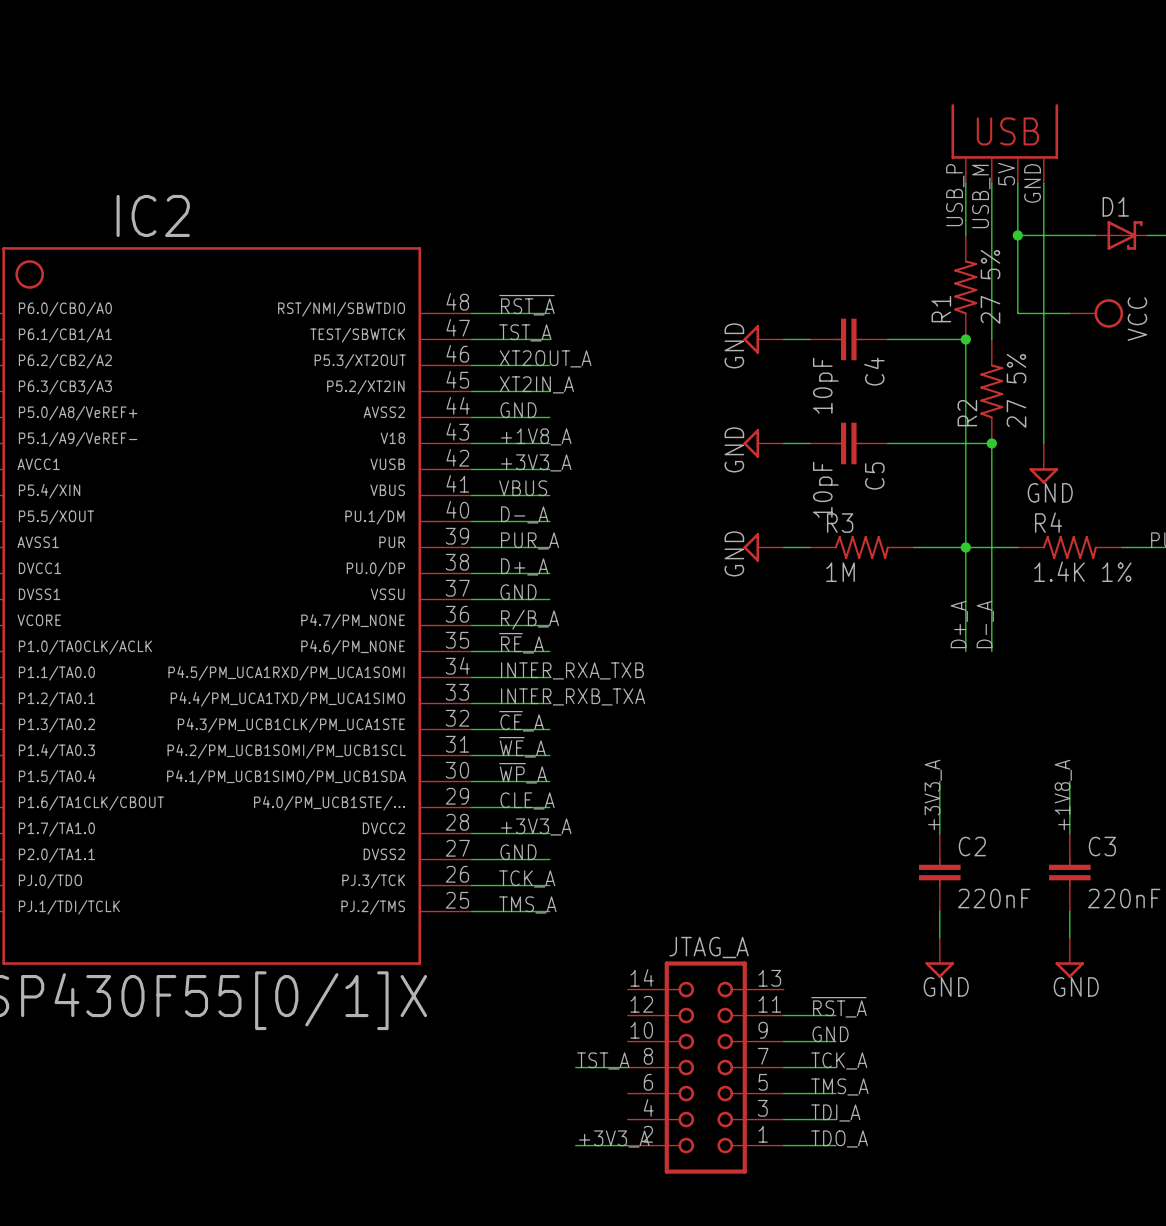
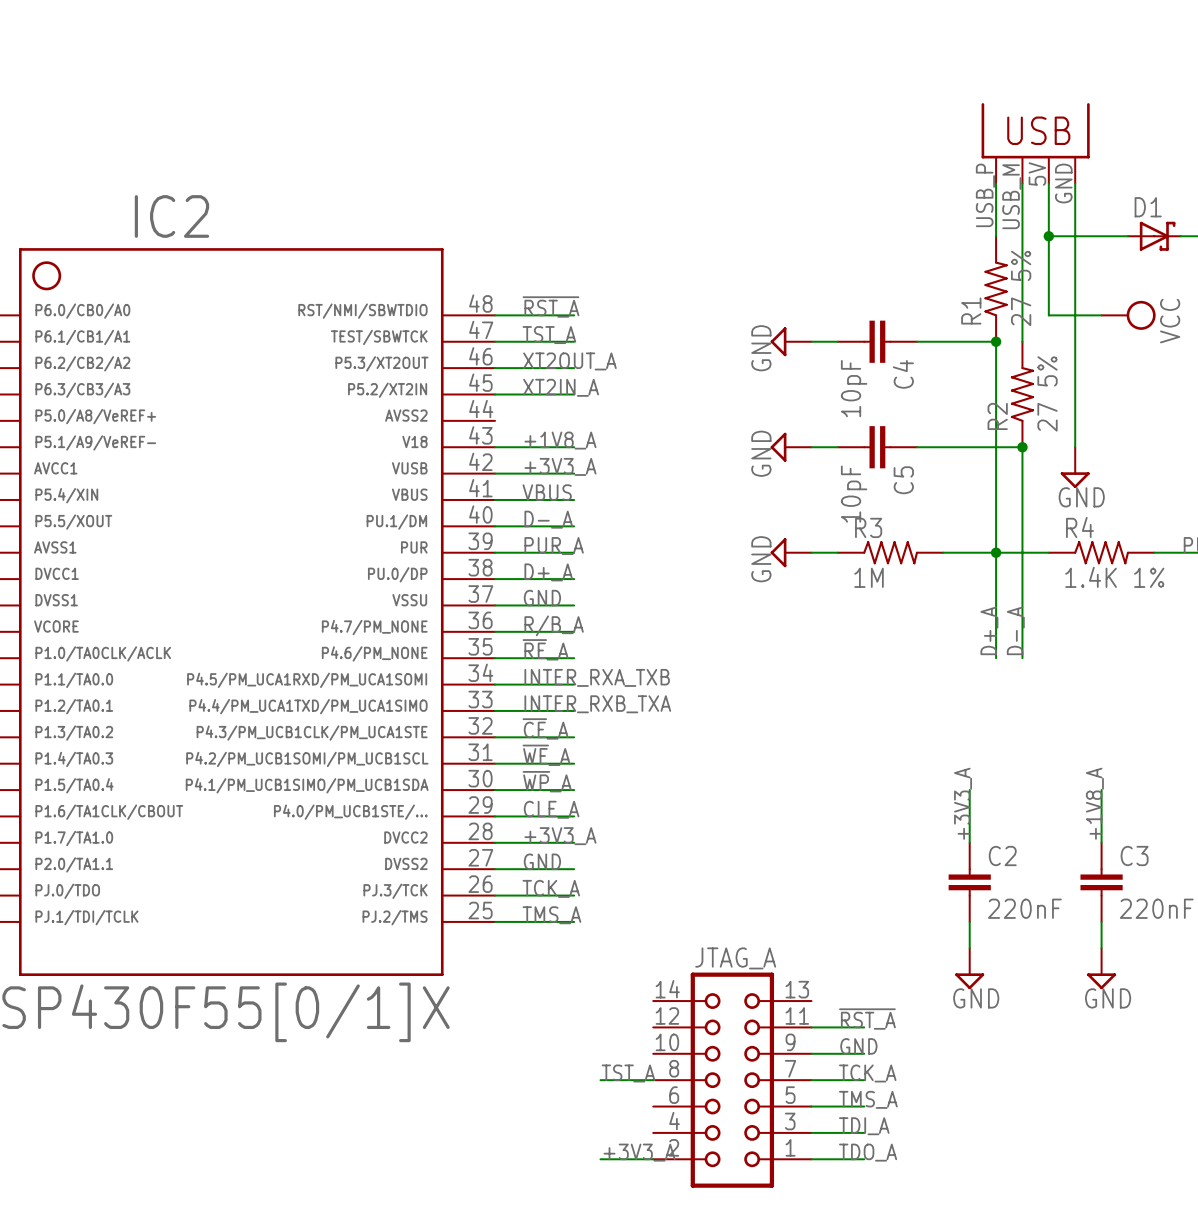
label: GND (518, 410) -> none
wire: (471, 417) (549, 417) -> none

